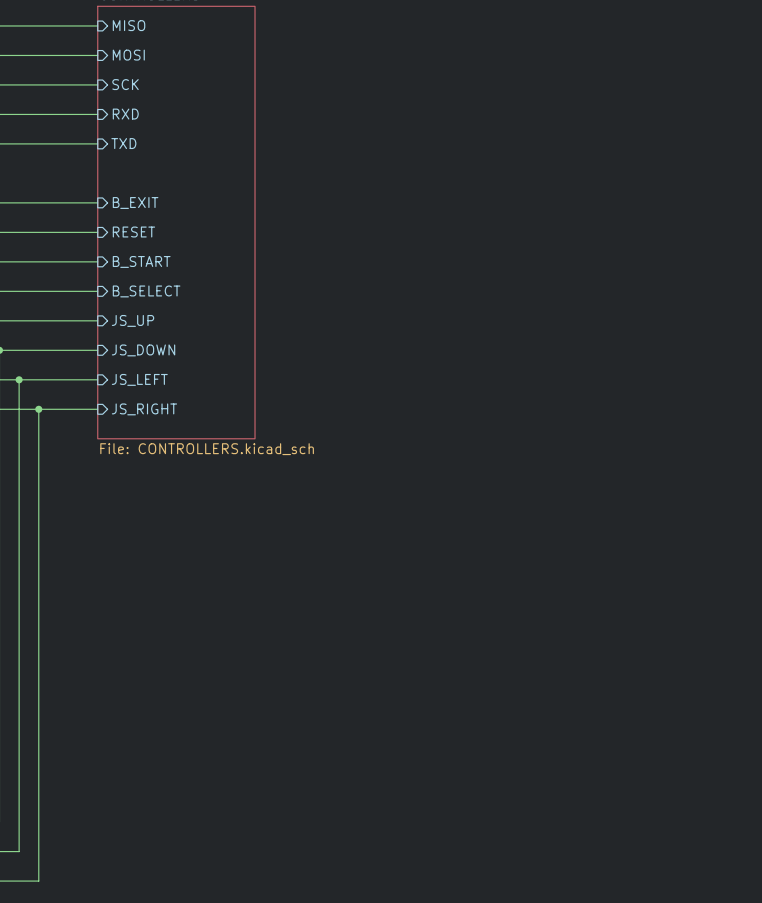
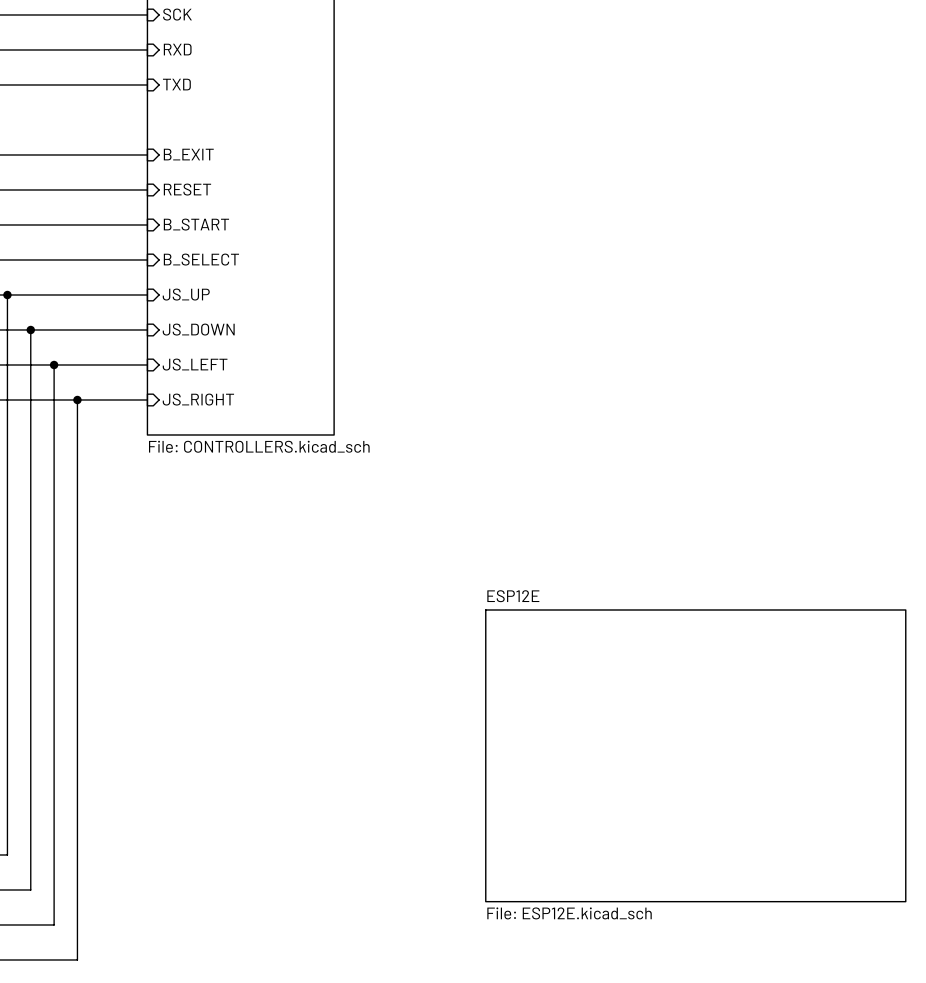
sheet ESP12E: none -> File: ESP12E.kicad_sch (695, 755)

